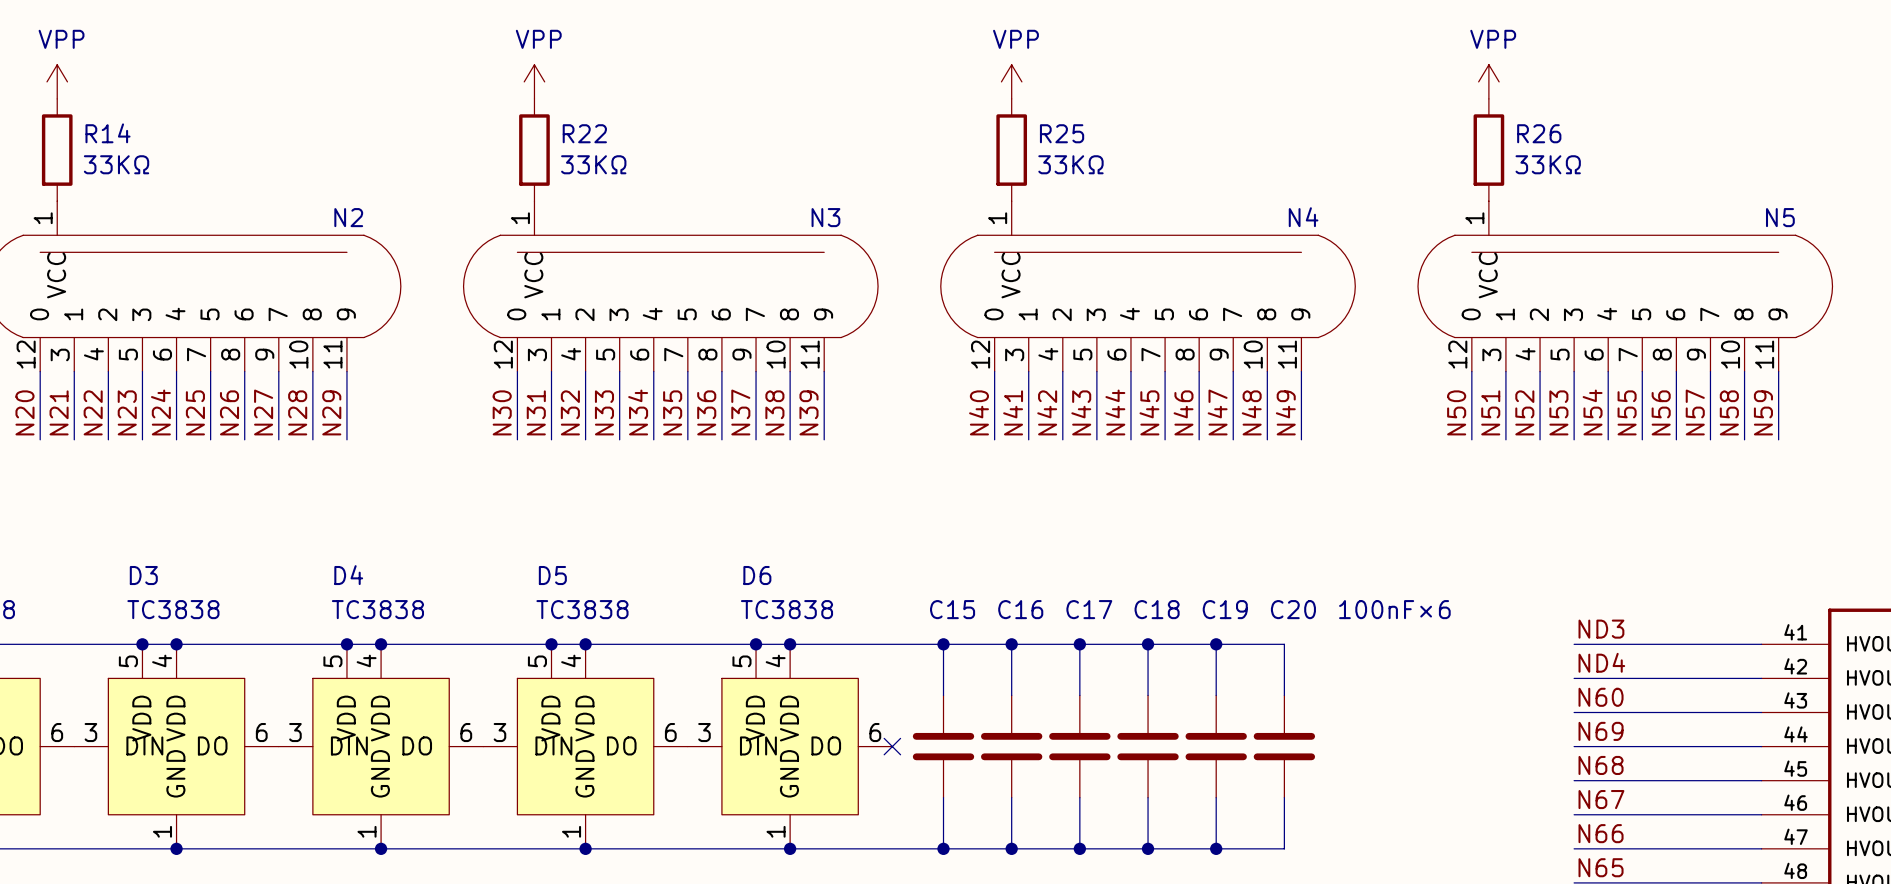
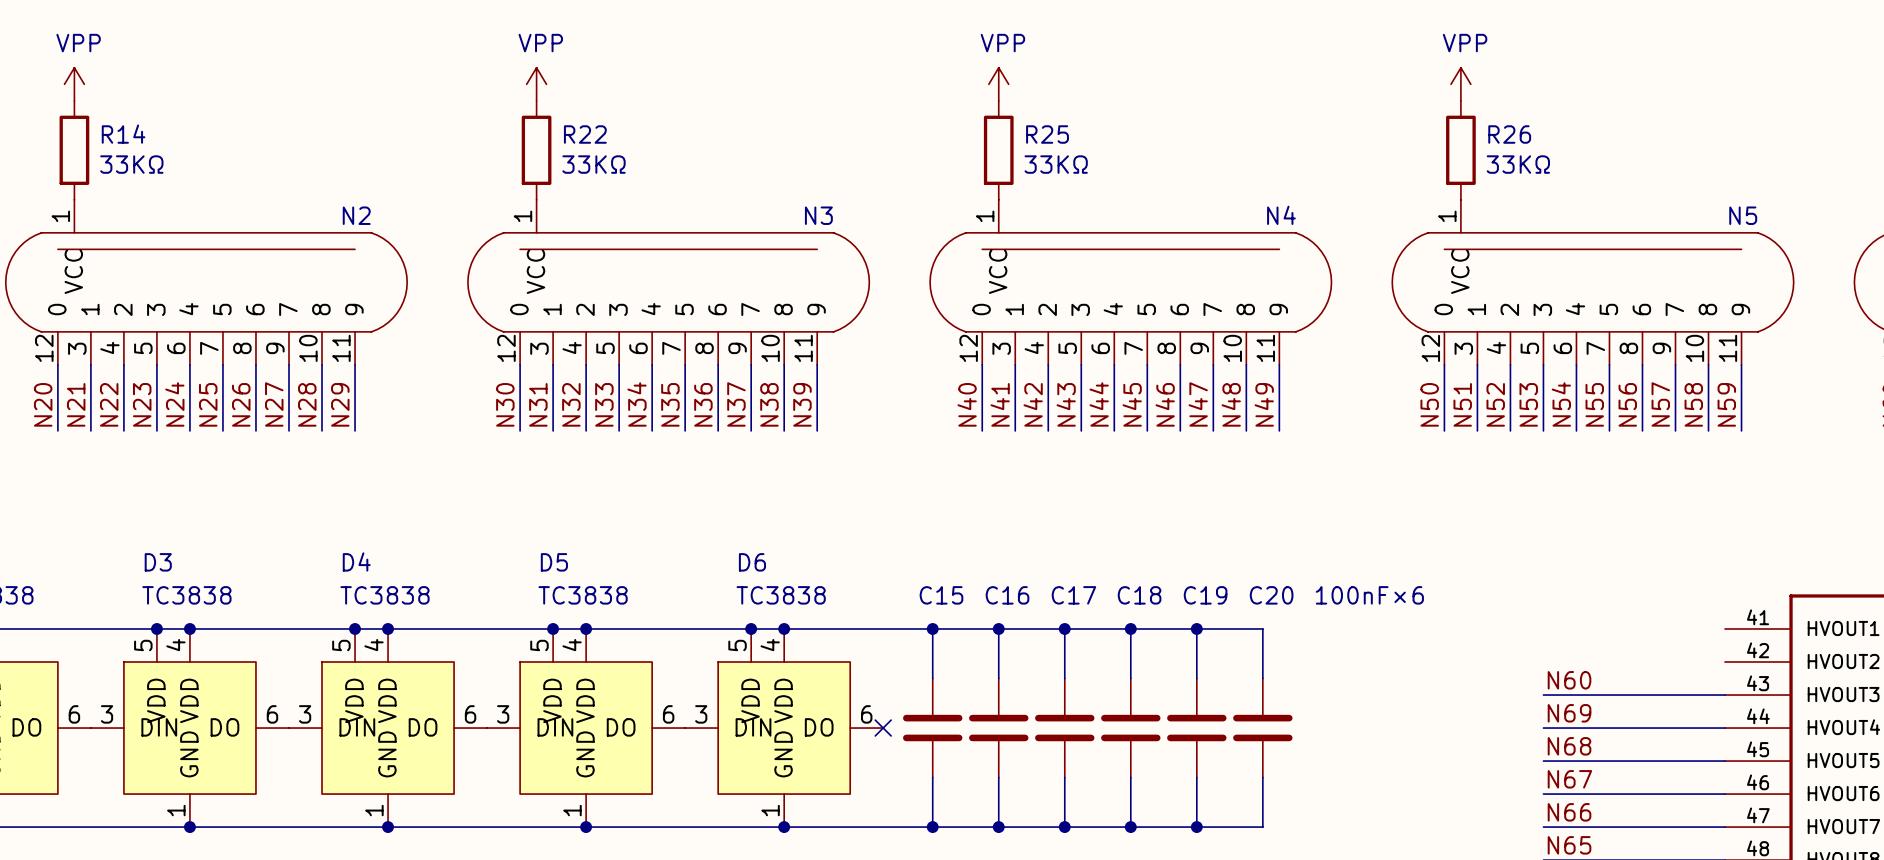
label: ND3 (1601, 629) -> none
wire: (1574, 644) (1761, 644) -> none
label: ND4 (1601, 662) -> none
wire: (1574, 678) (1761, 678) -> none

